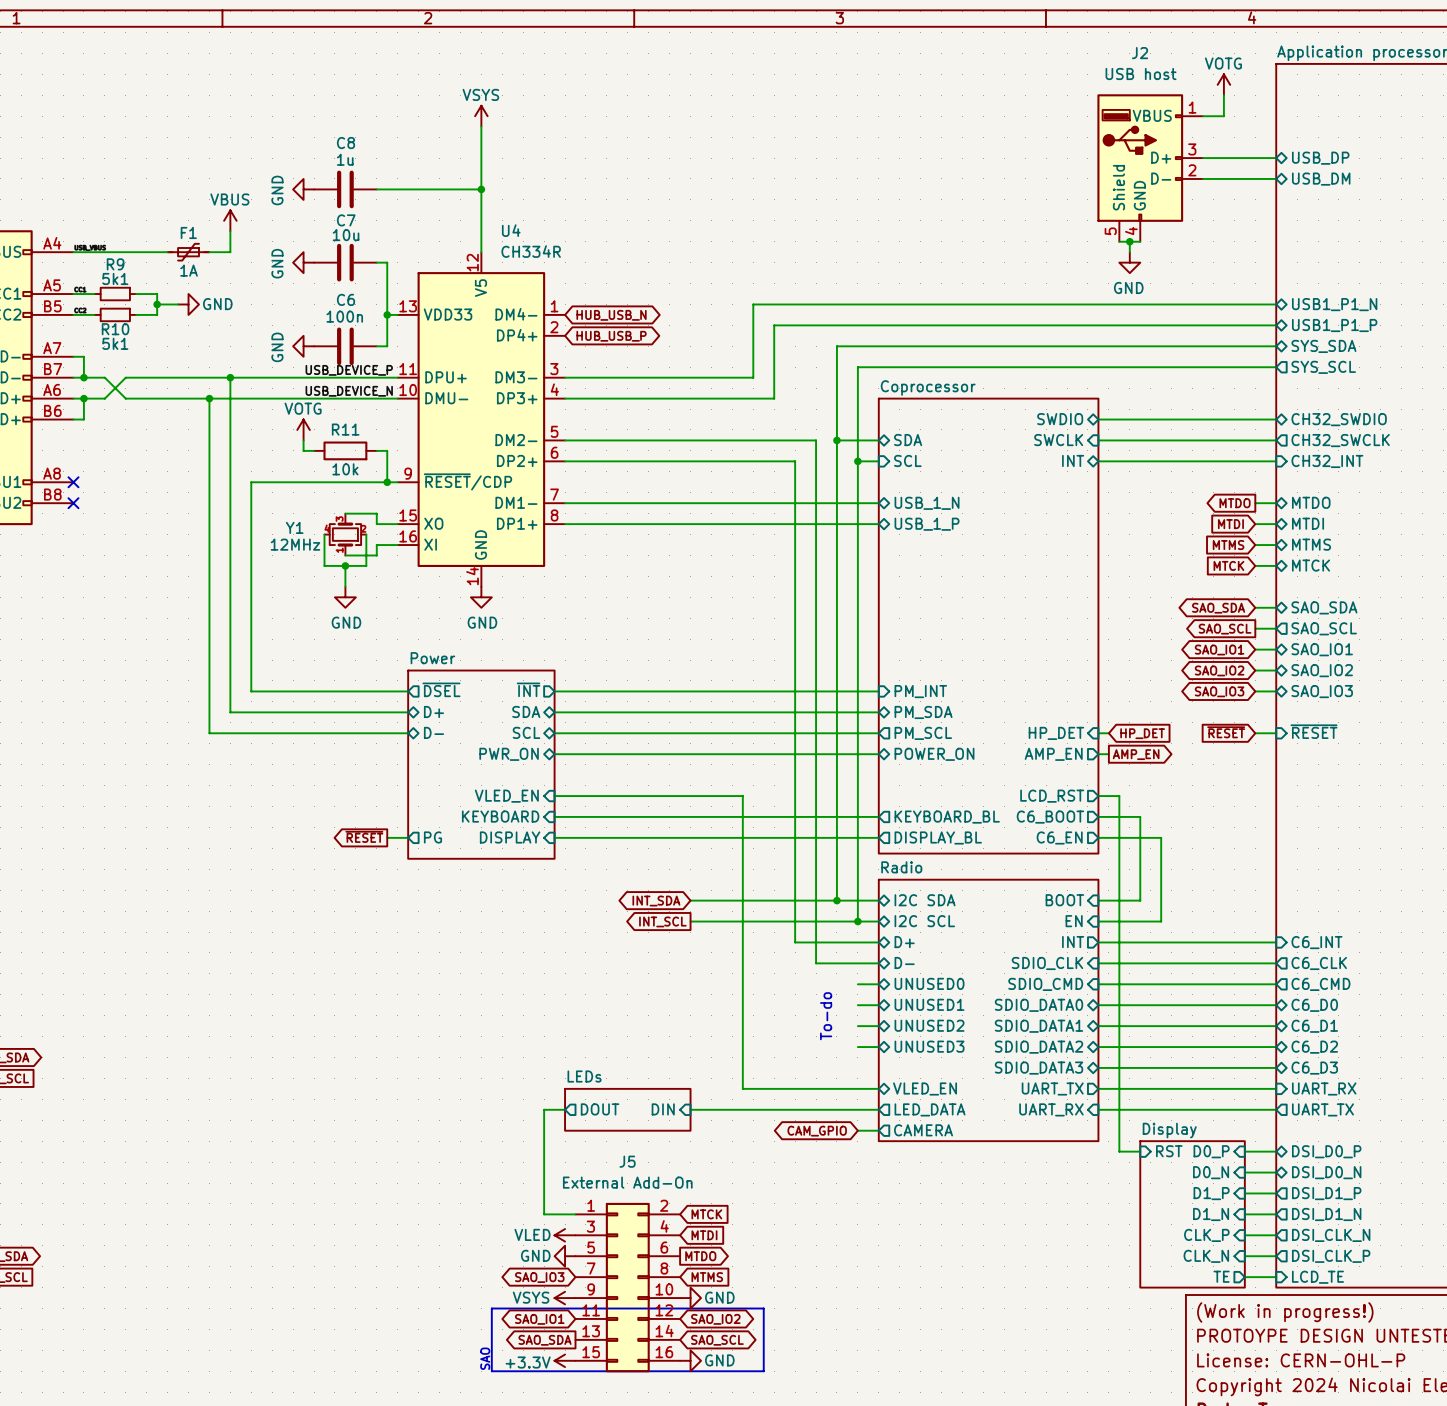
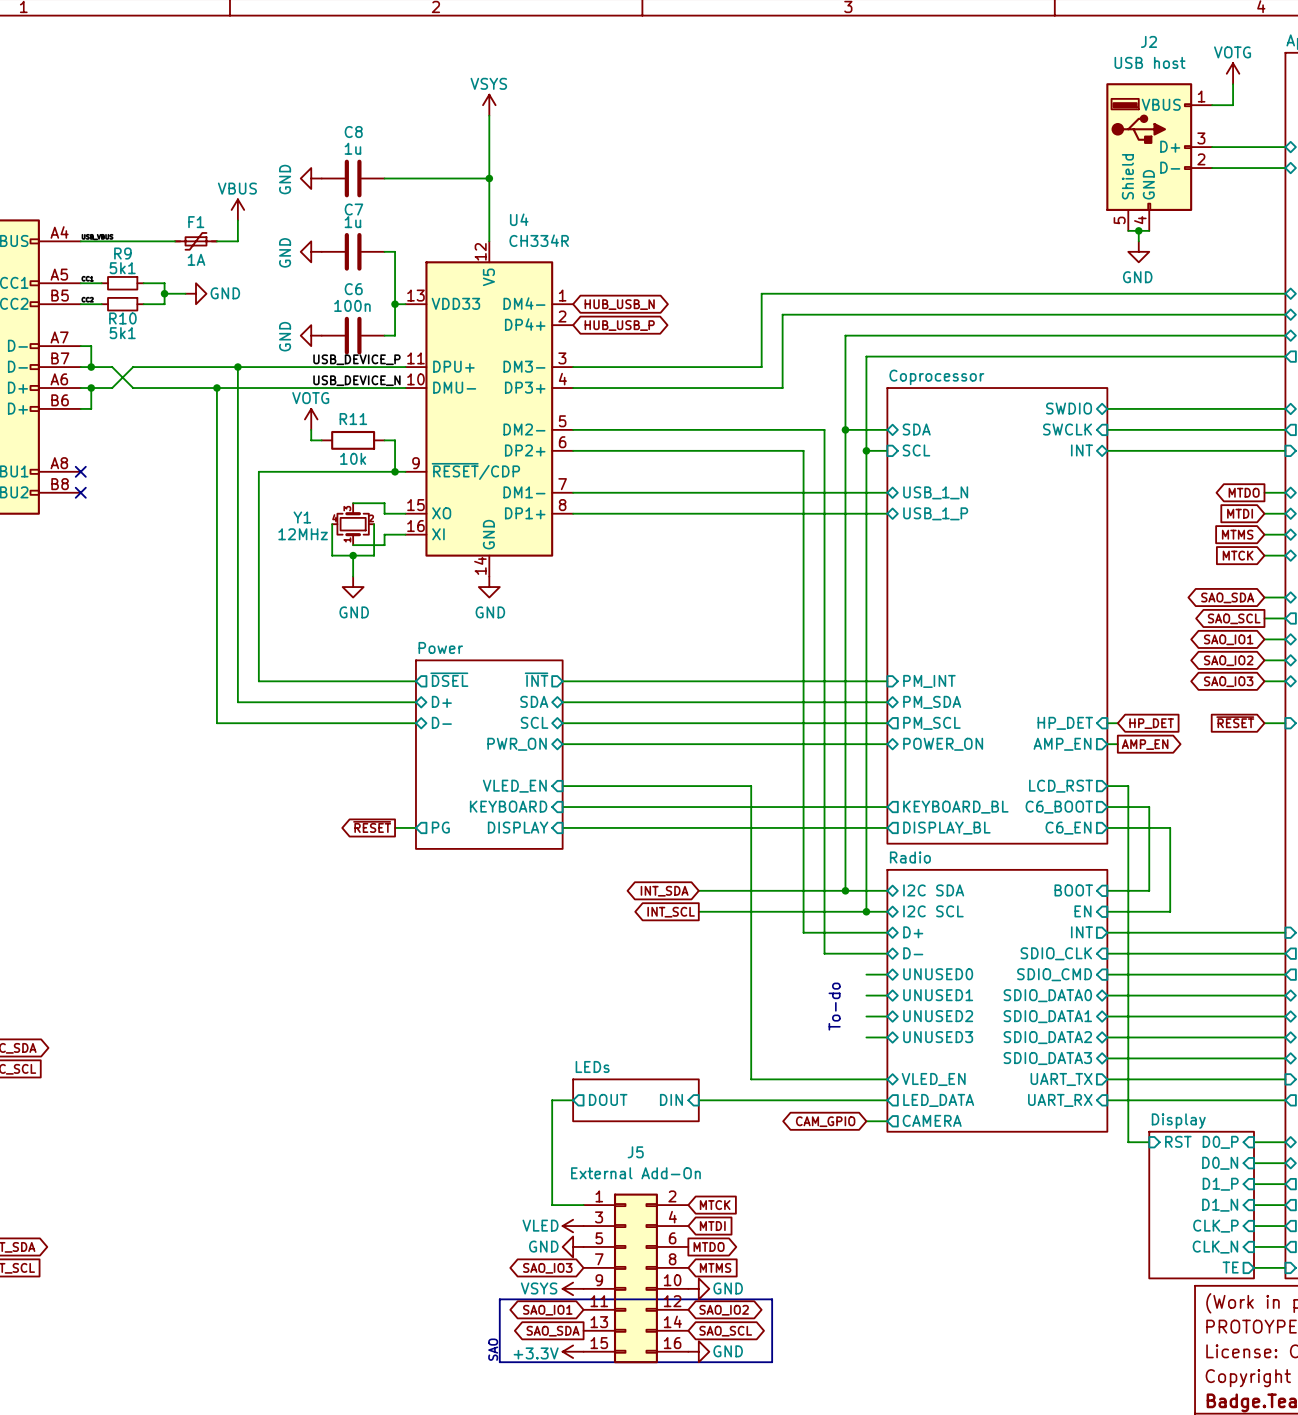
C7 value: 10u (346, 235) -> 1u (352, 222)

